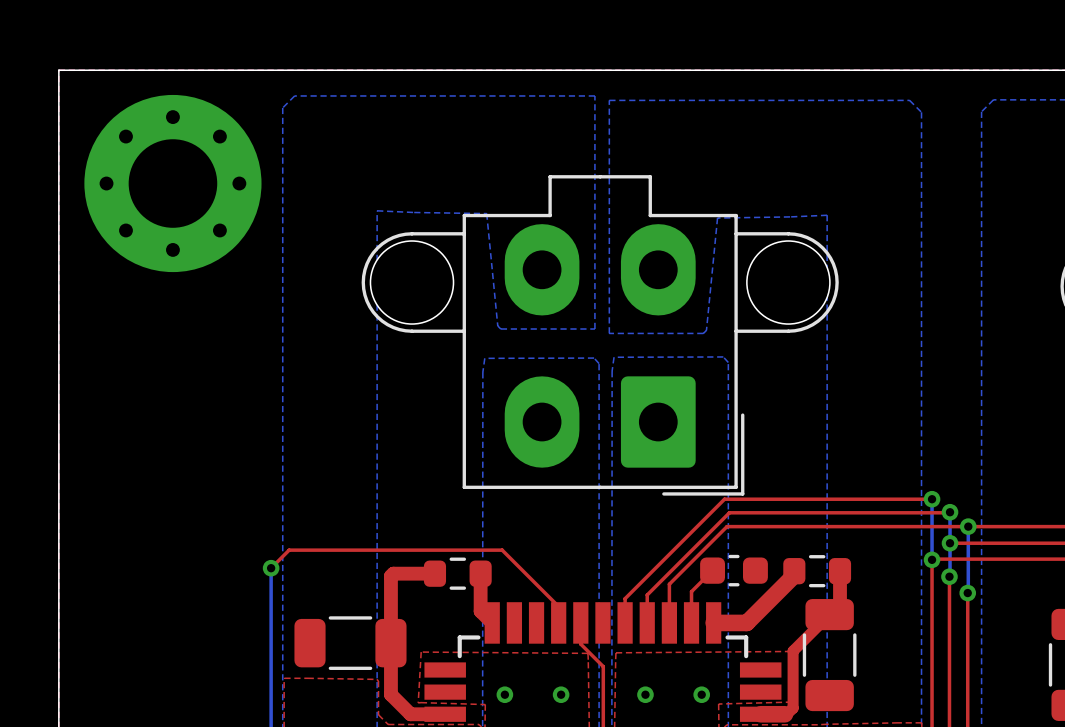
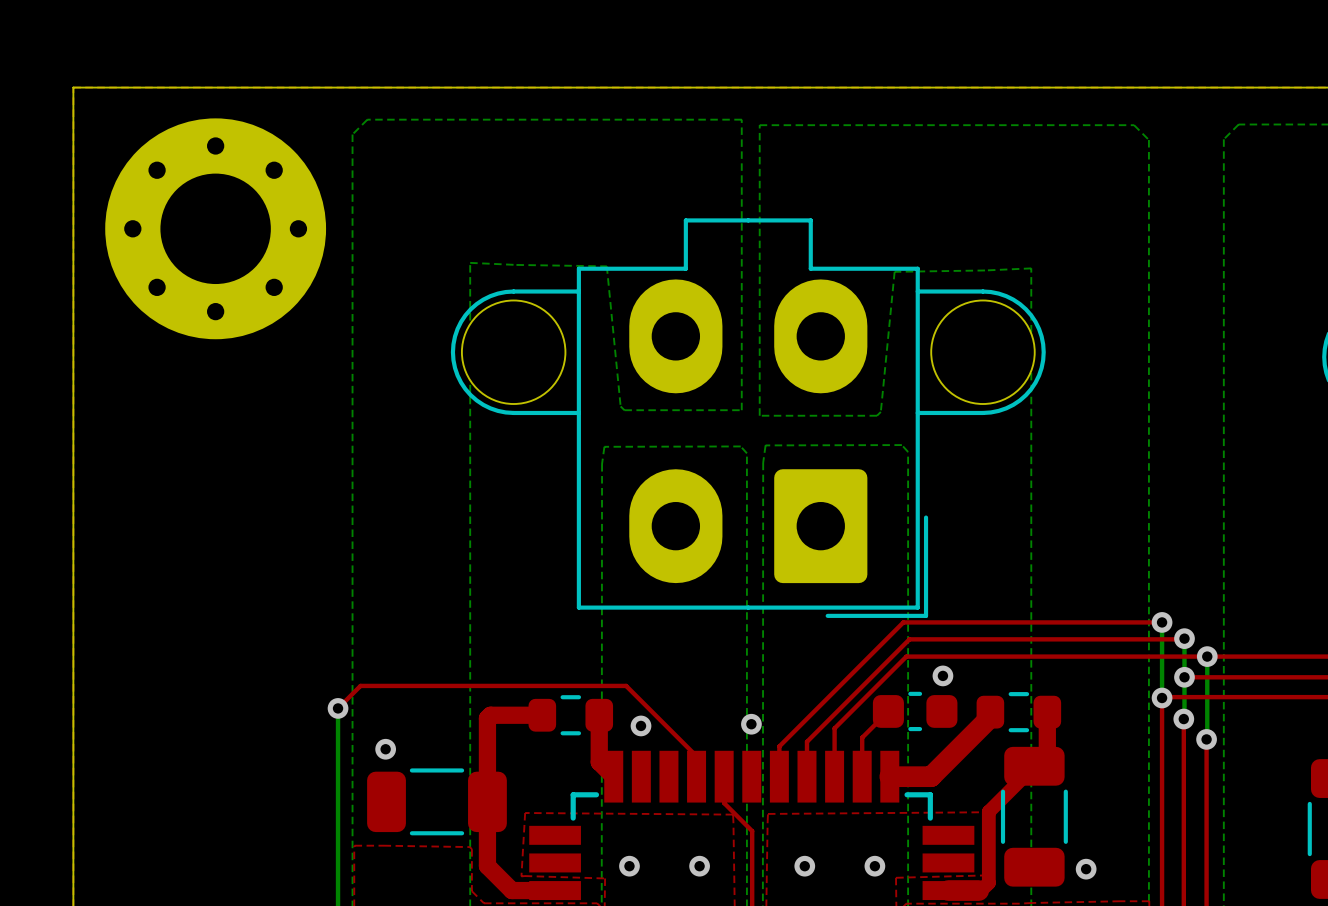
via: none -> (942, 675)
via: none -> (751, 724)
via: none -> (641, 725)
via: none -> (385, 749)
via: none -> (1086, 869)

